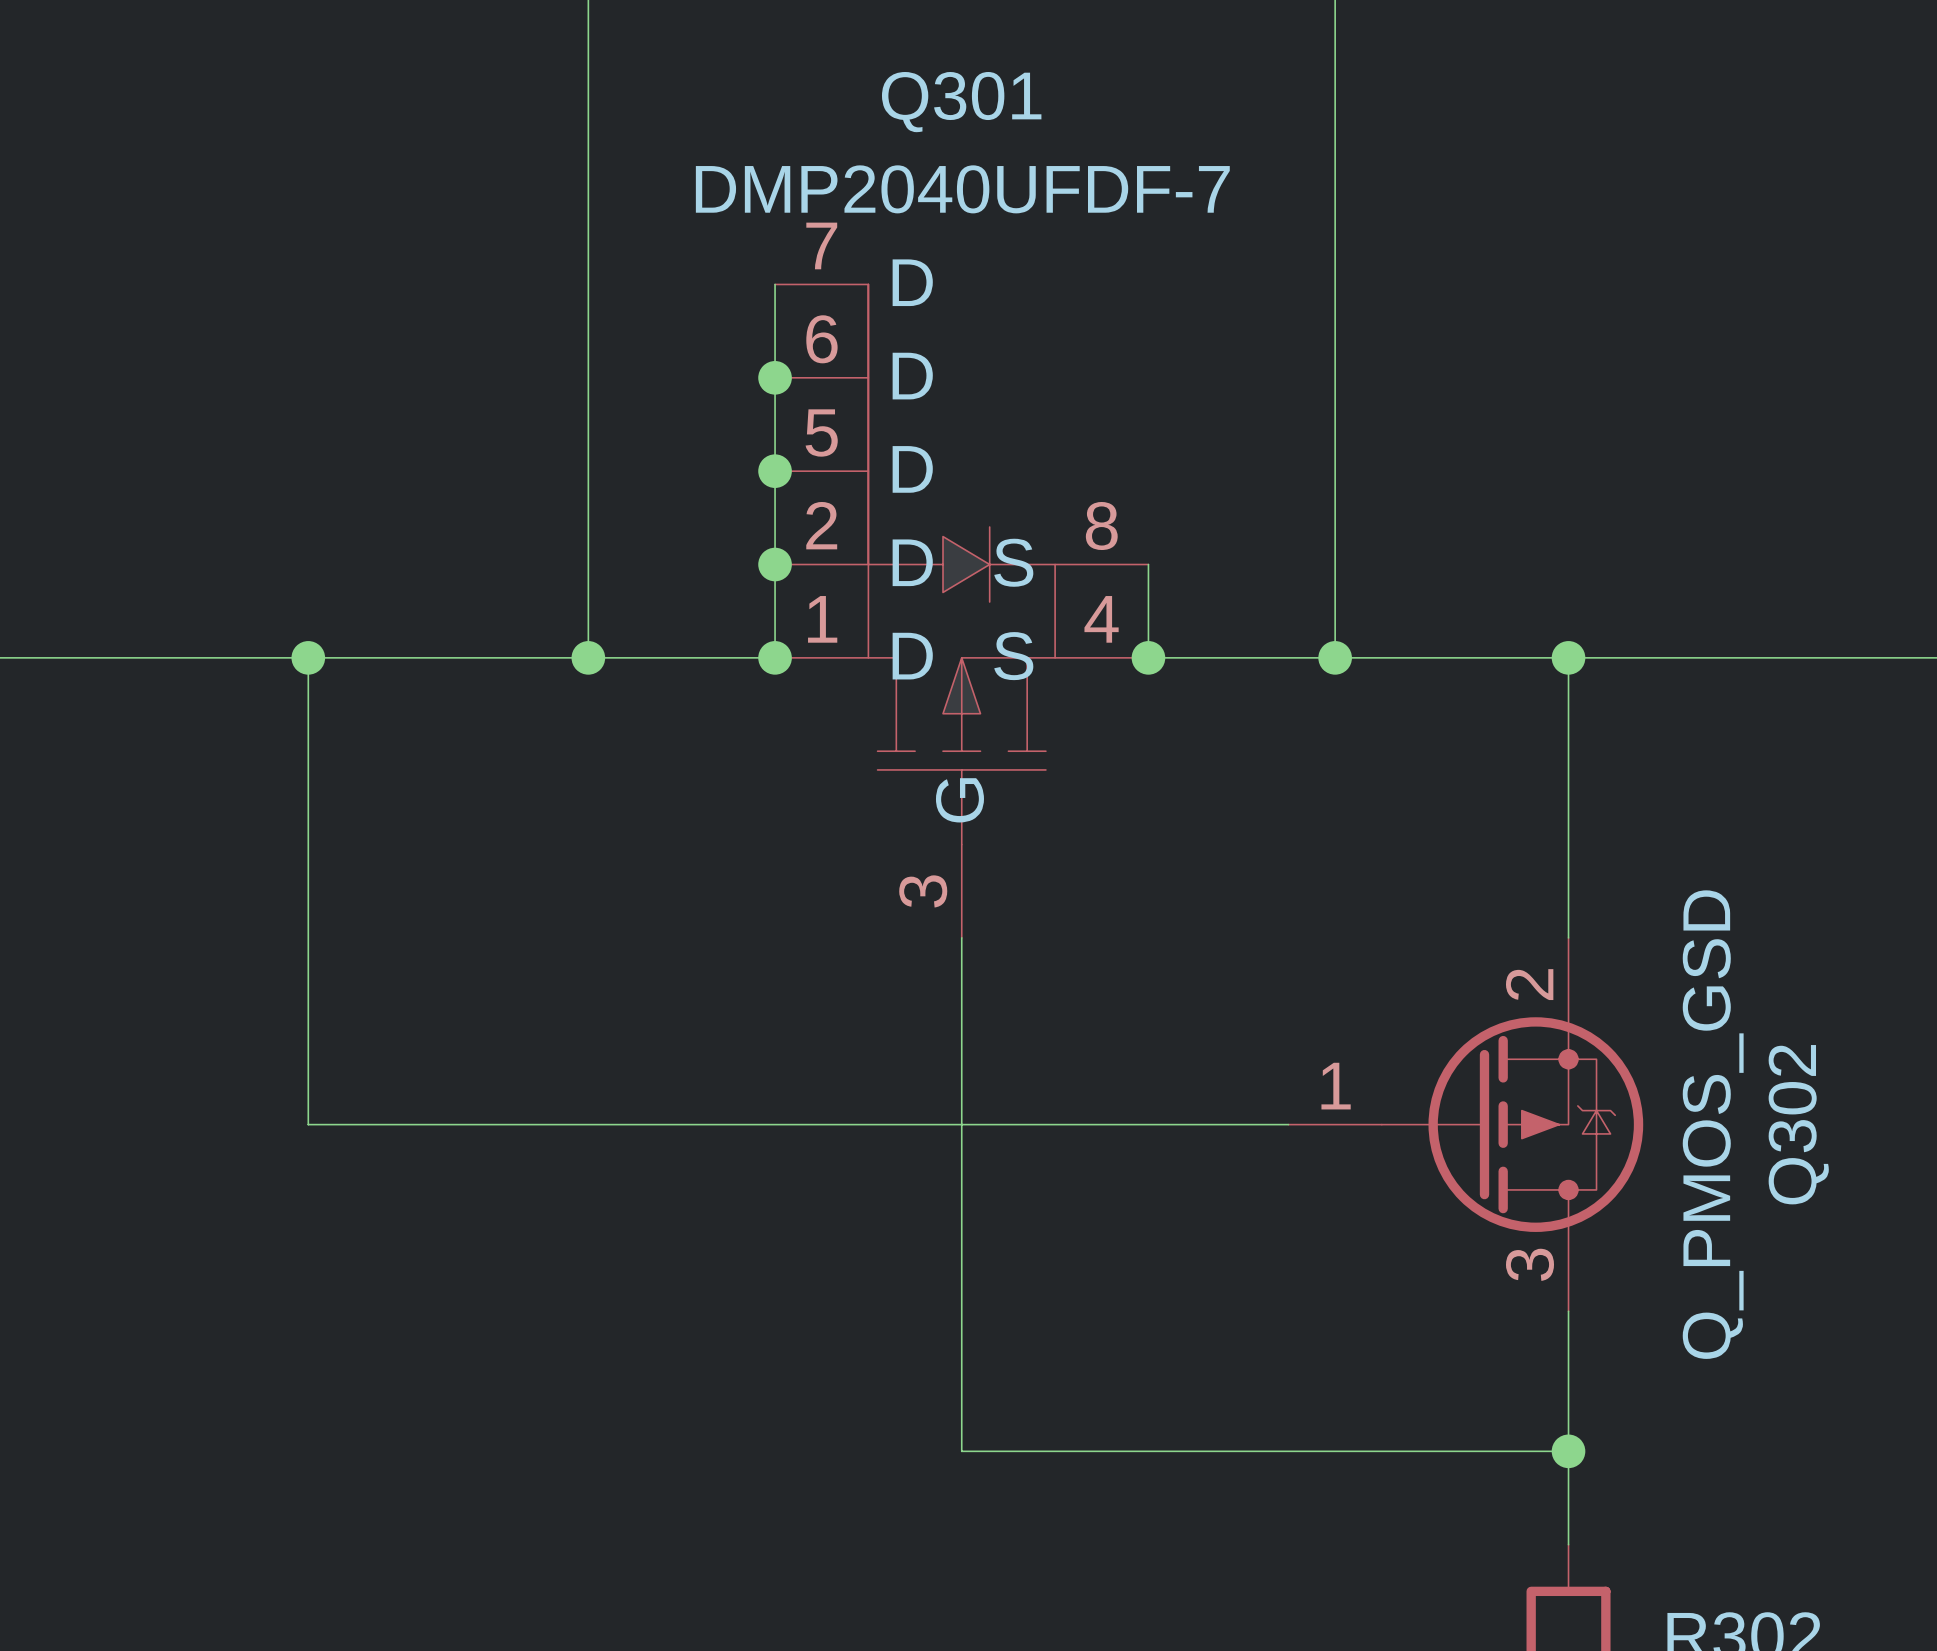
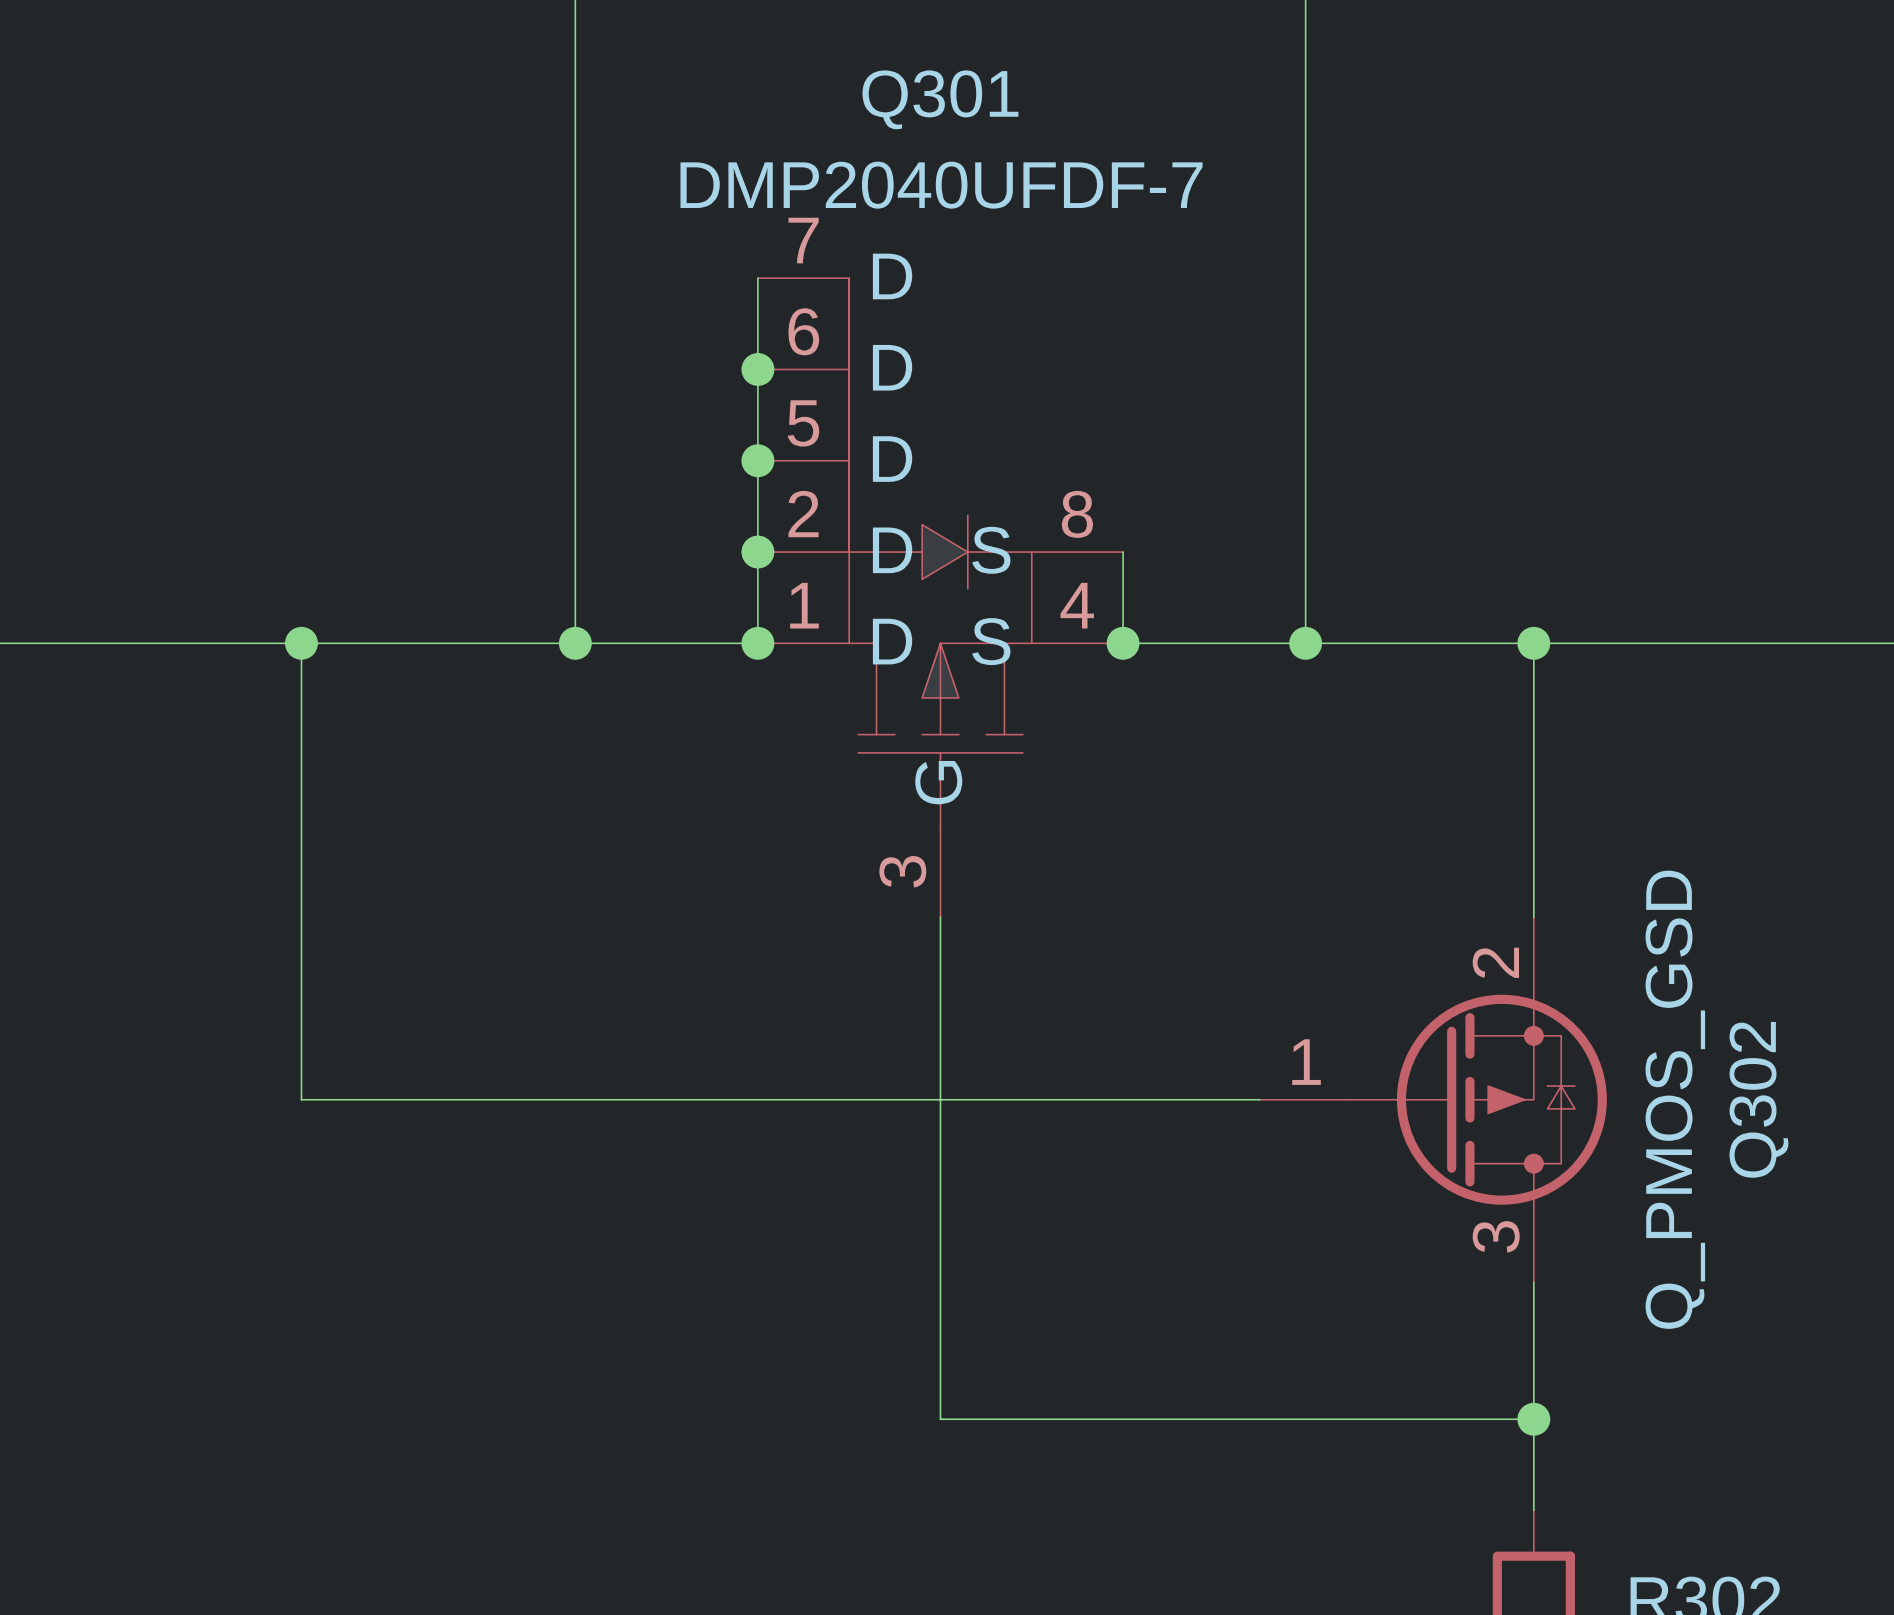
Q302 symbol: [1288, 937, 1644, 1312] -> [1259, 917, 1607, 1283]

